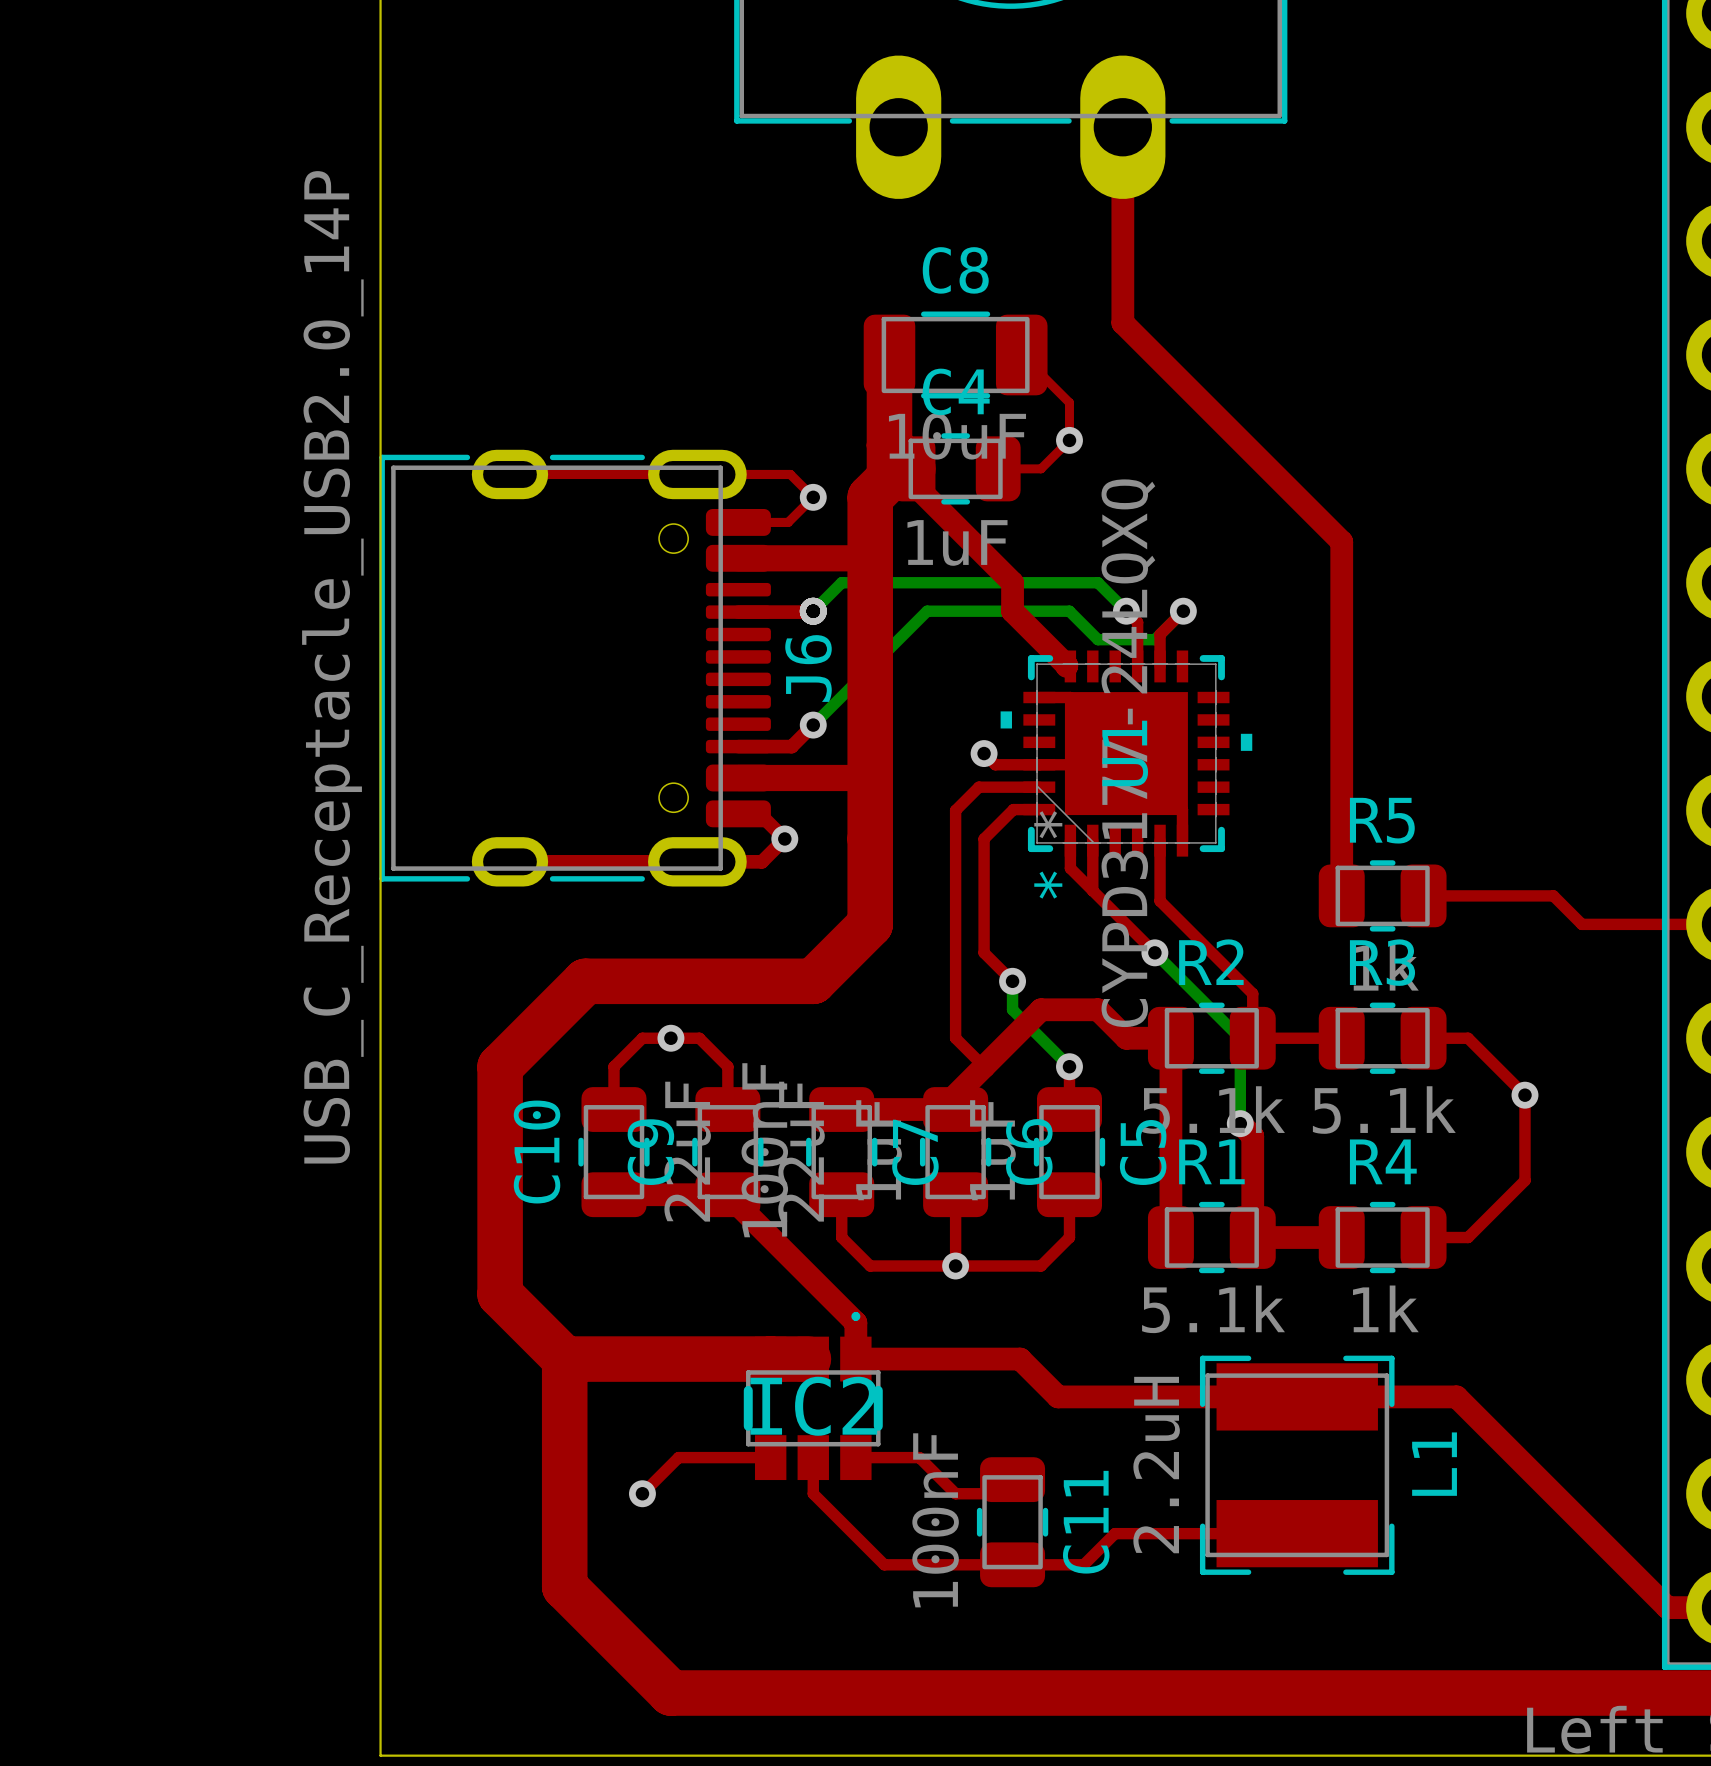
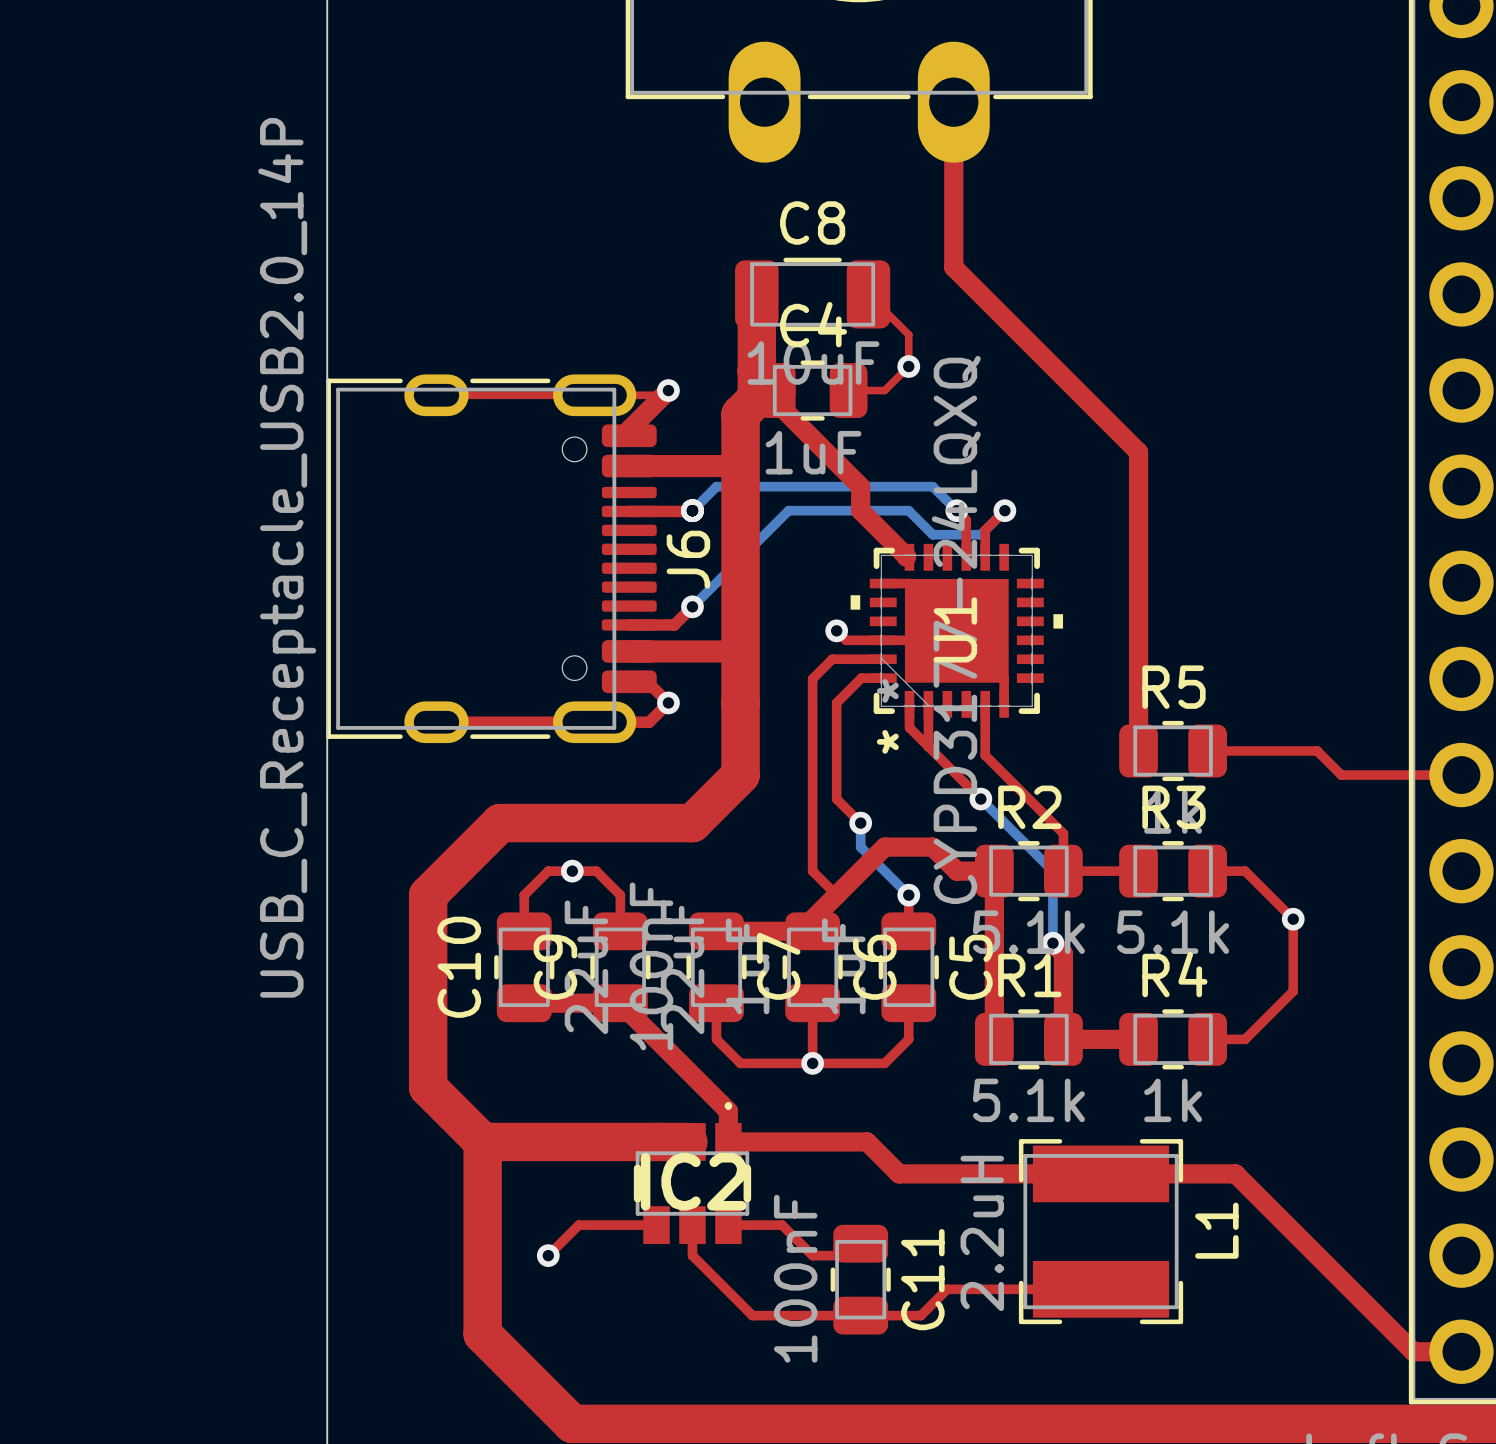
top track: (779, 474) (790, 474) (813, 497) (788, 522) (738, 522) (741, 525) -> (663, 395) (668, 390) (629, 429) (629, 435)
via position: (813, 497) -> (668, 390)

